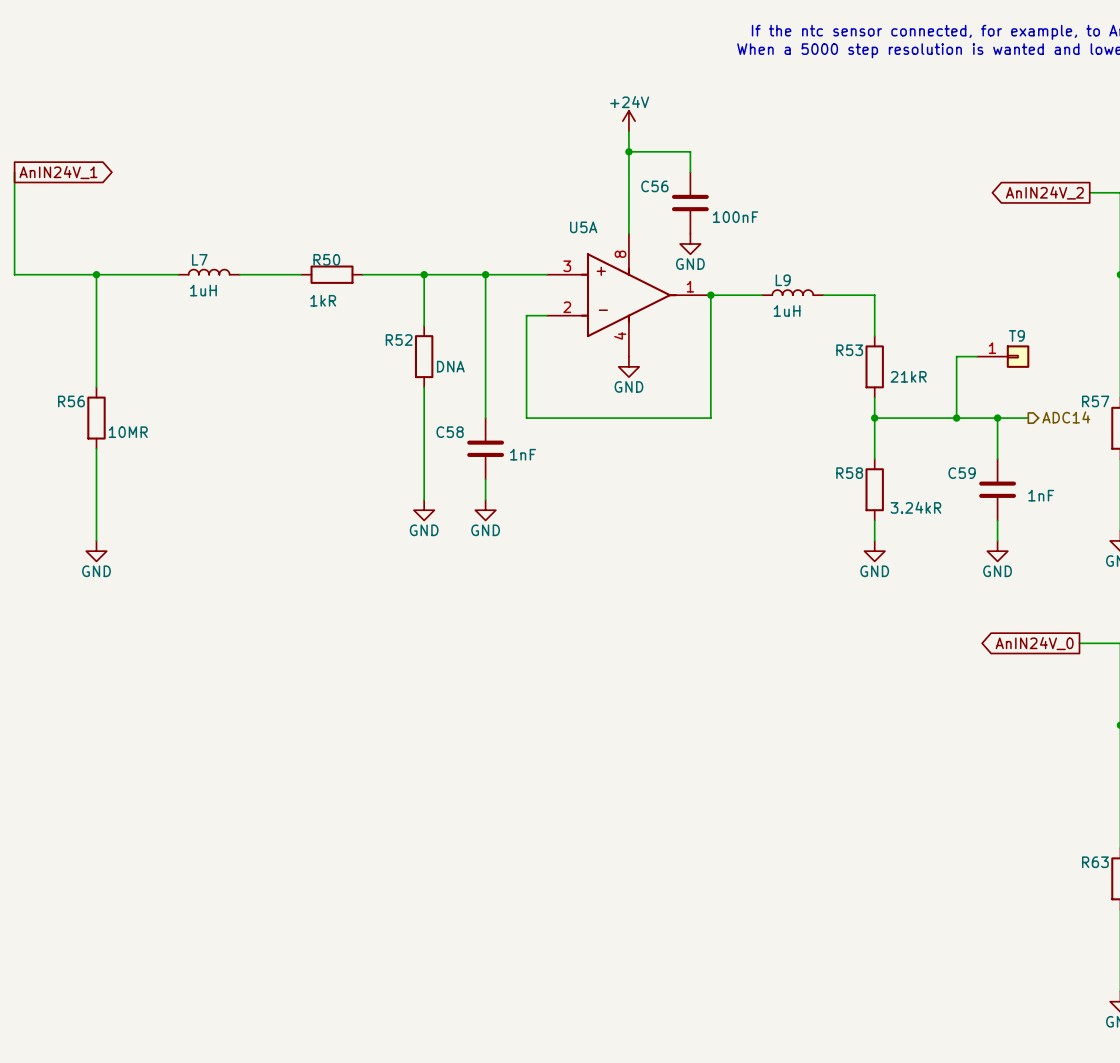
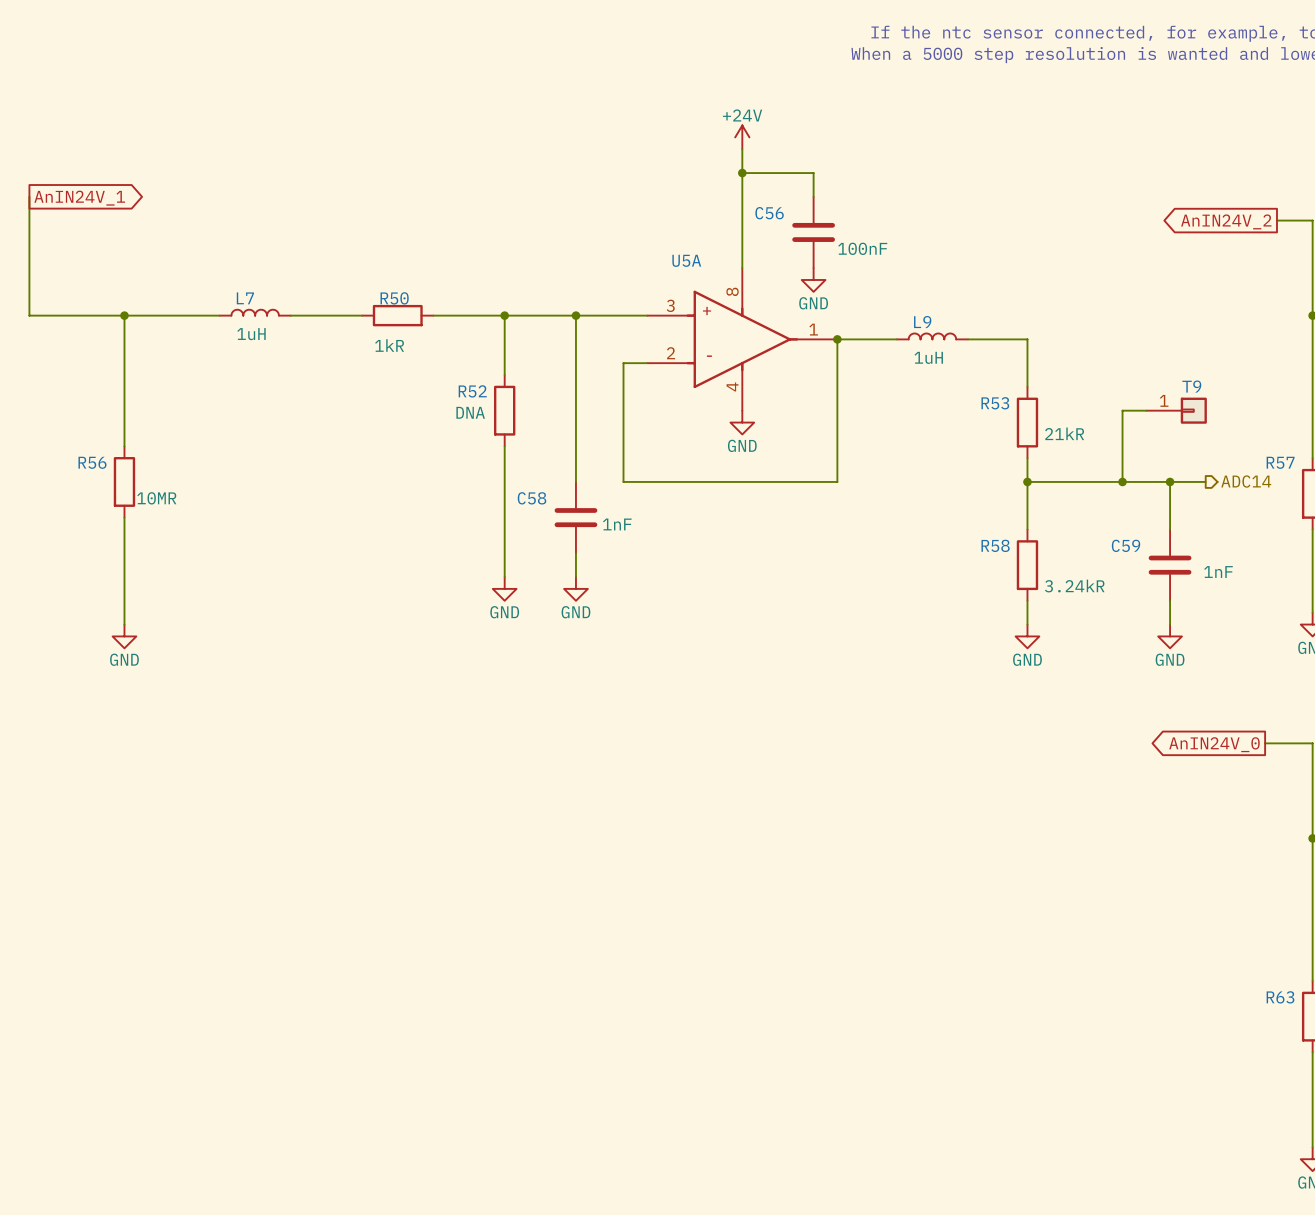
R52 value position: DNA (450, 366) -> DNA (470, 412)

